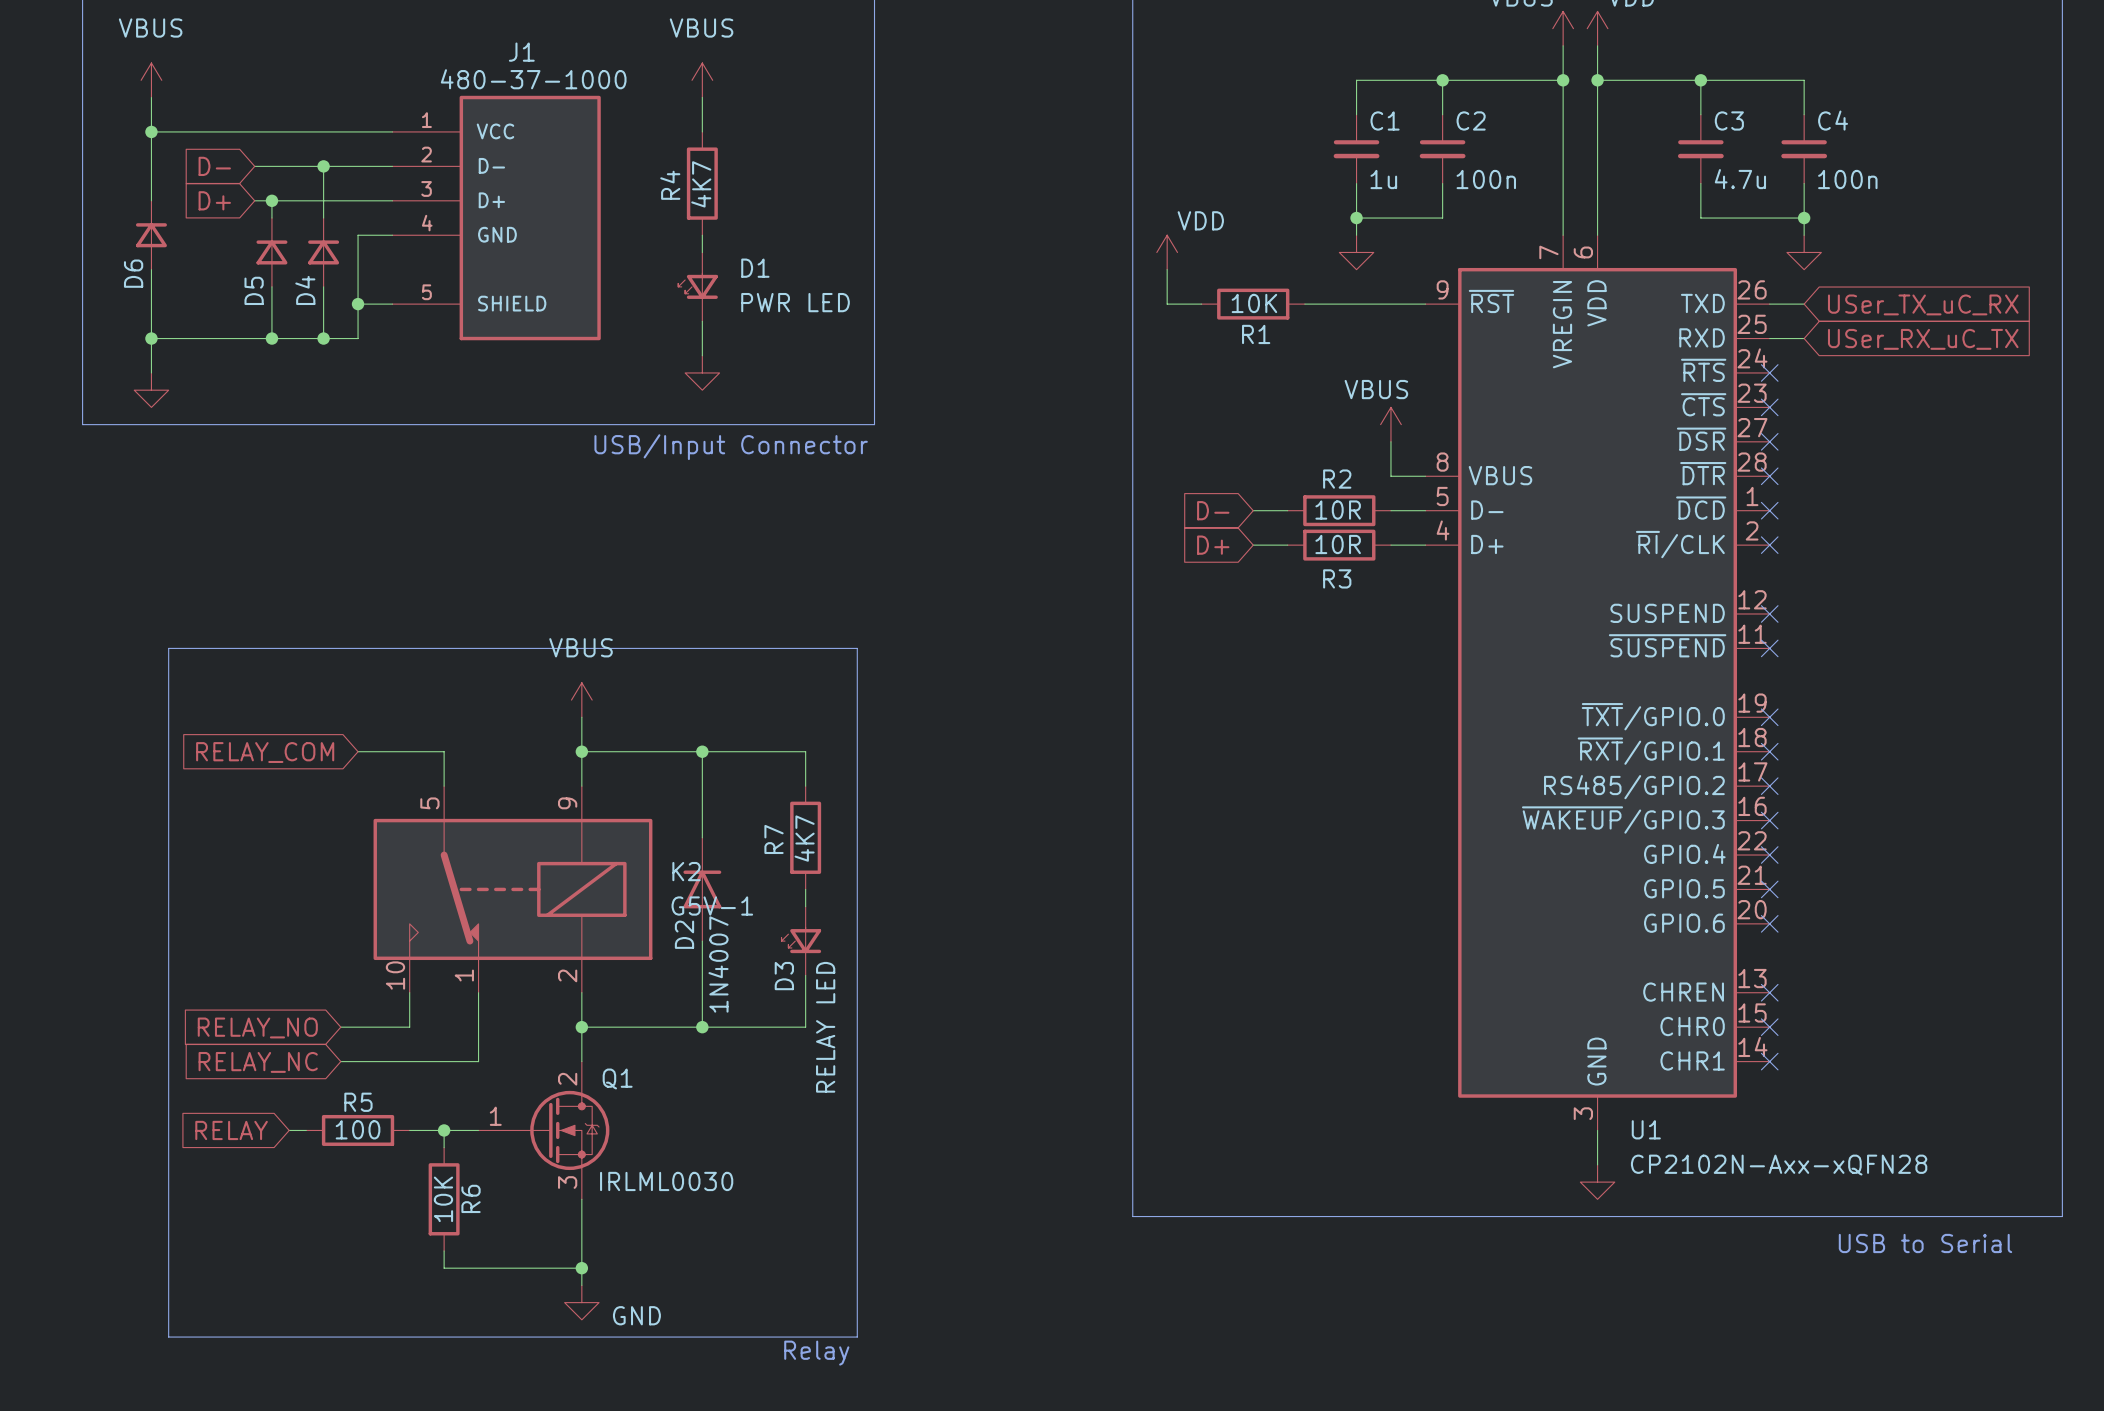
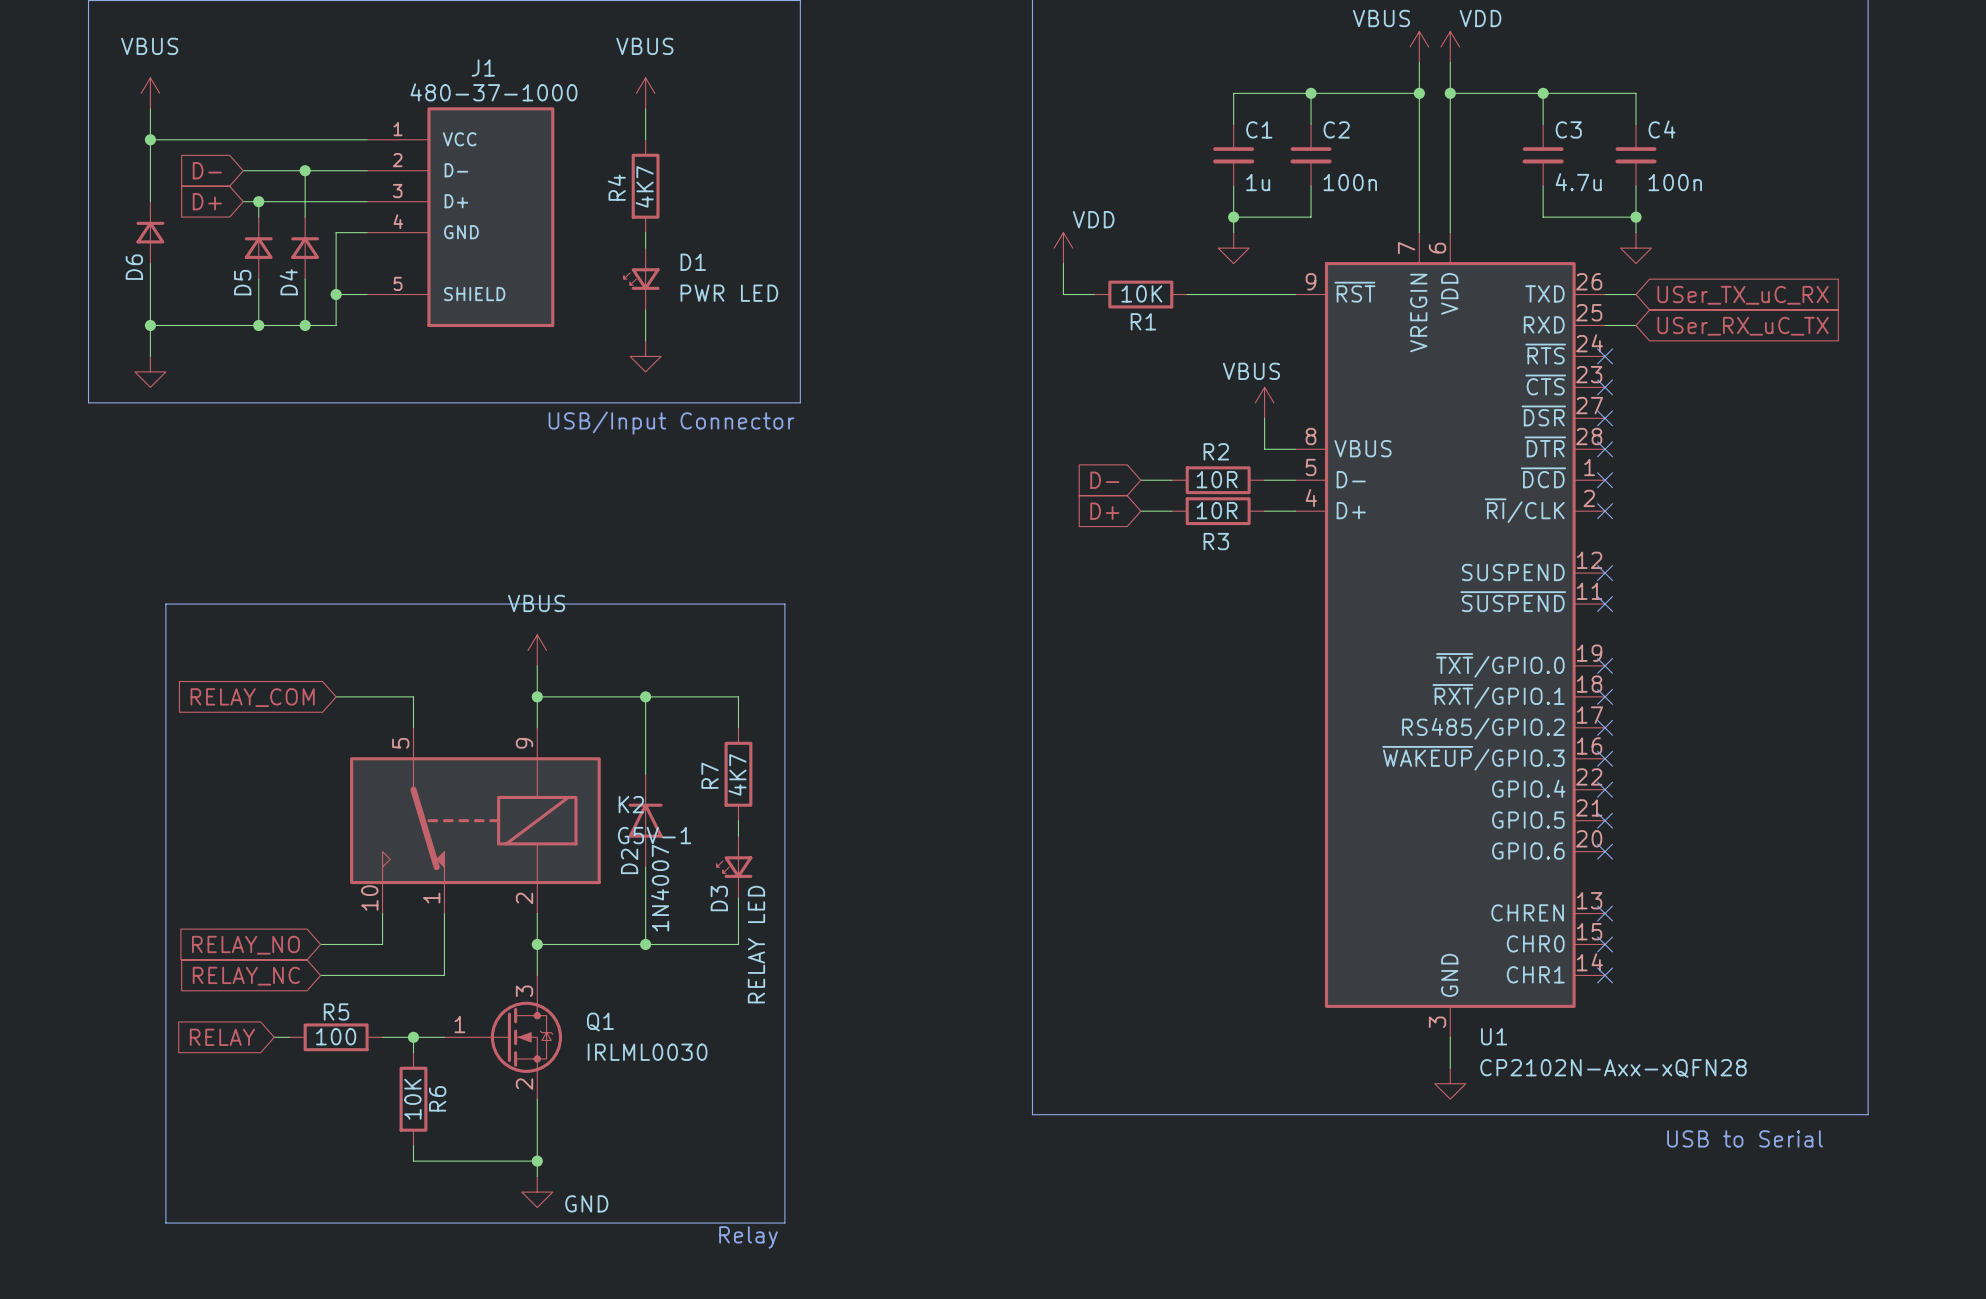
Q1 name position: Q1 (617, 1078) -> Q1 (600, 1022)
Q1 pin number: 2 (567, 1079) -> 3 (524, 991)
Q1 value position: IRLML0030 (666, 1181) -> IRLML0030 (647, 1052)
Q1 pin number: 3 (567, 1182) -> 2 (524, 1084)

